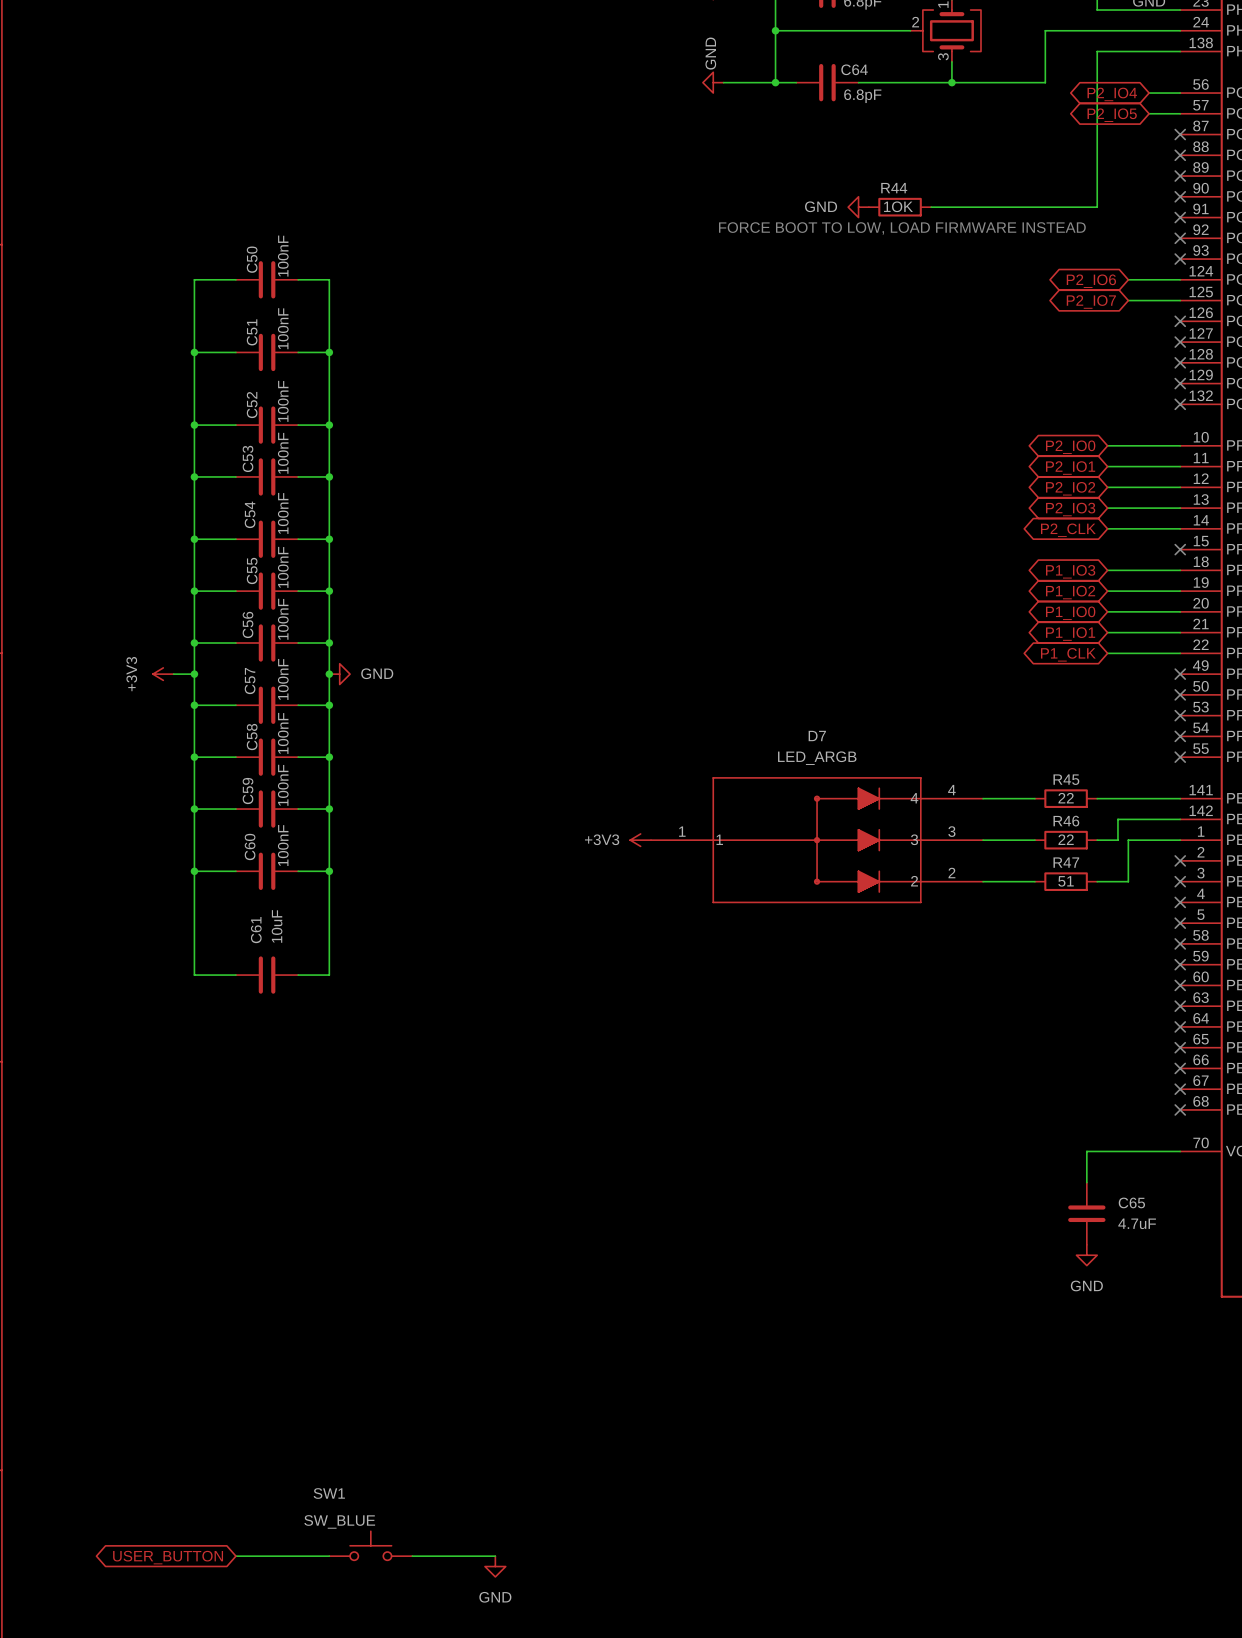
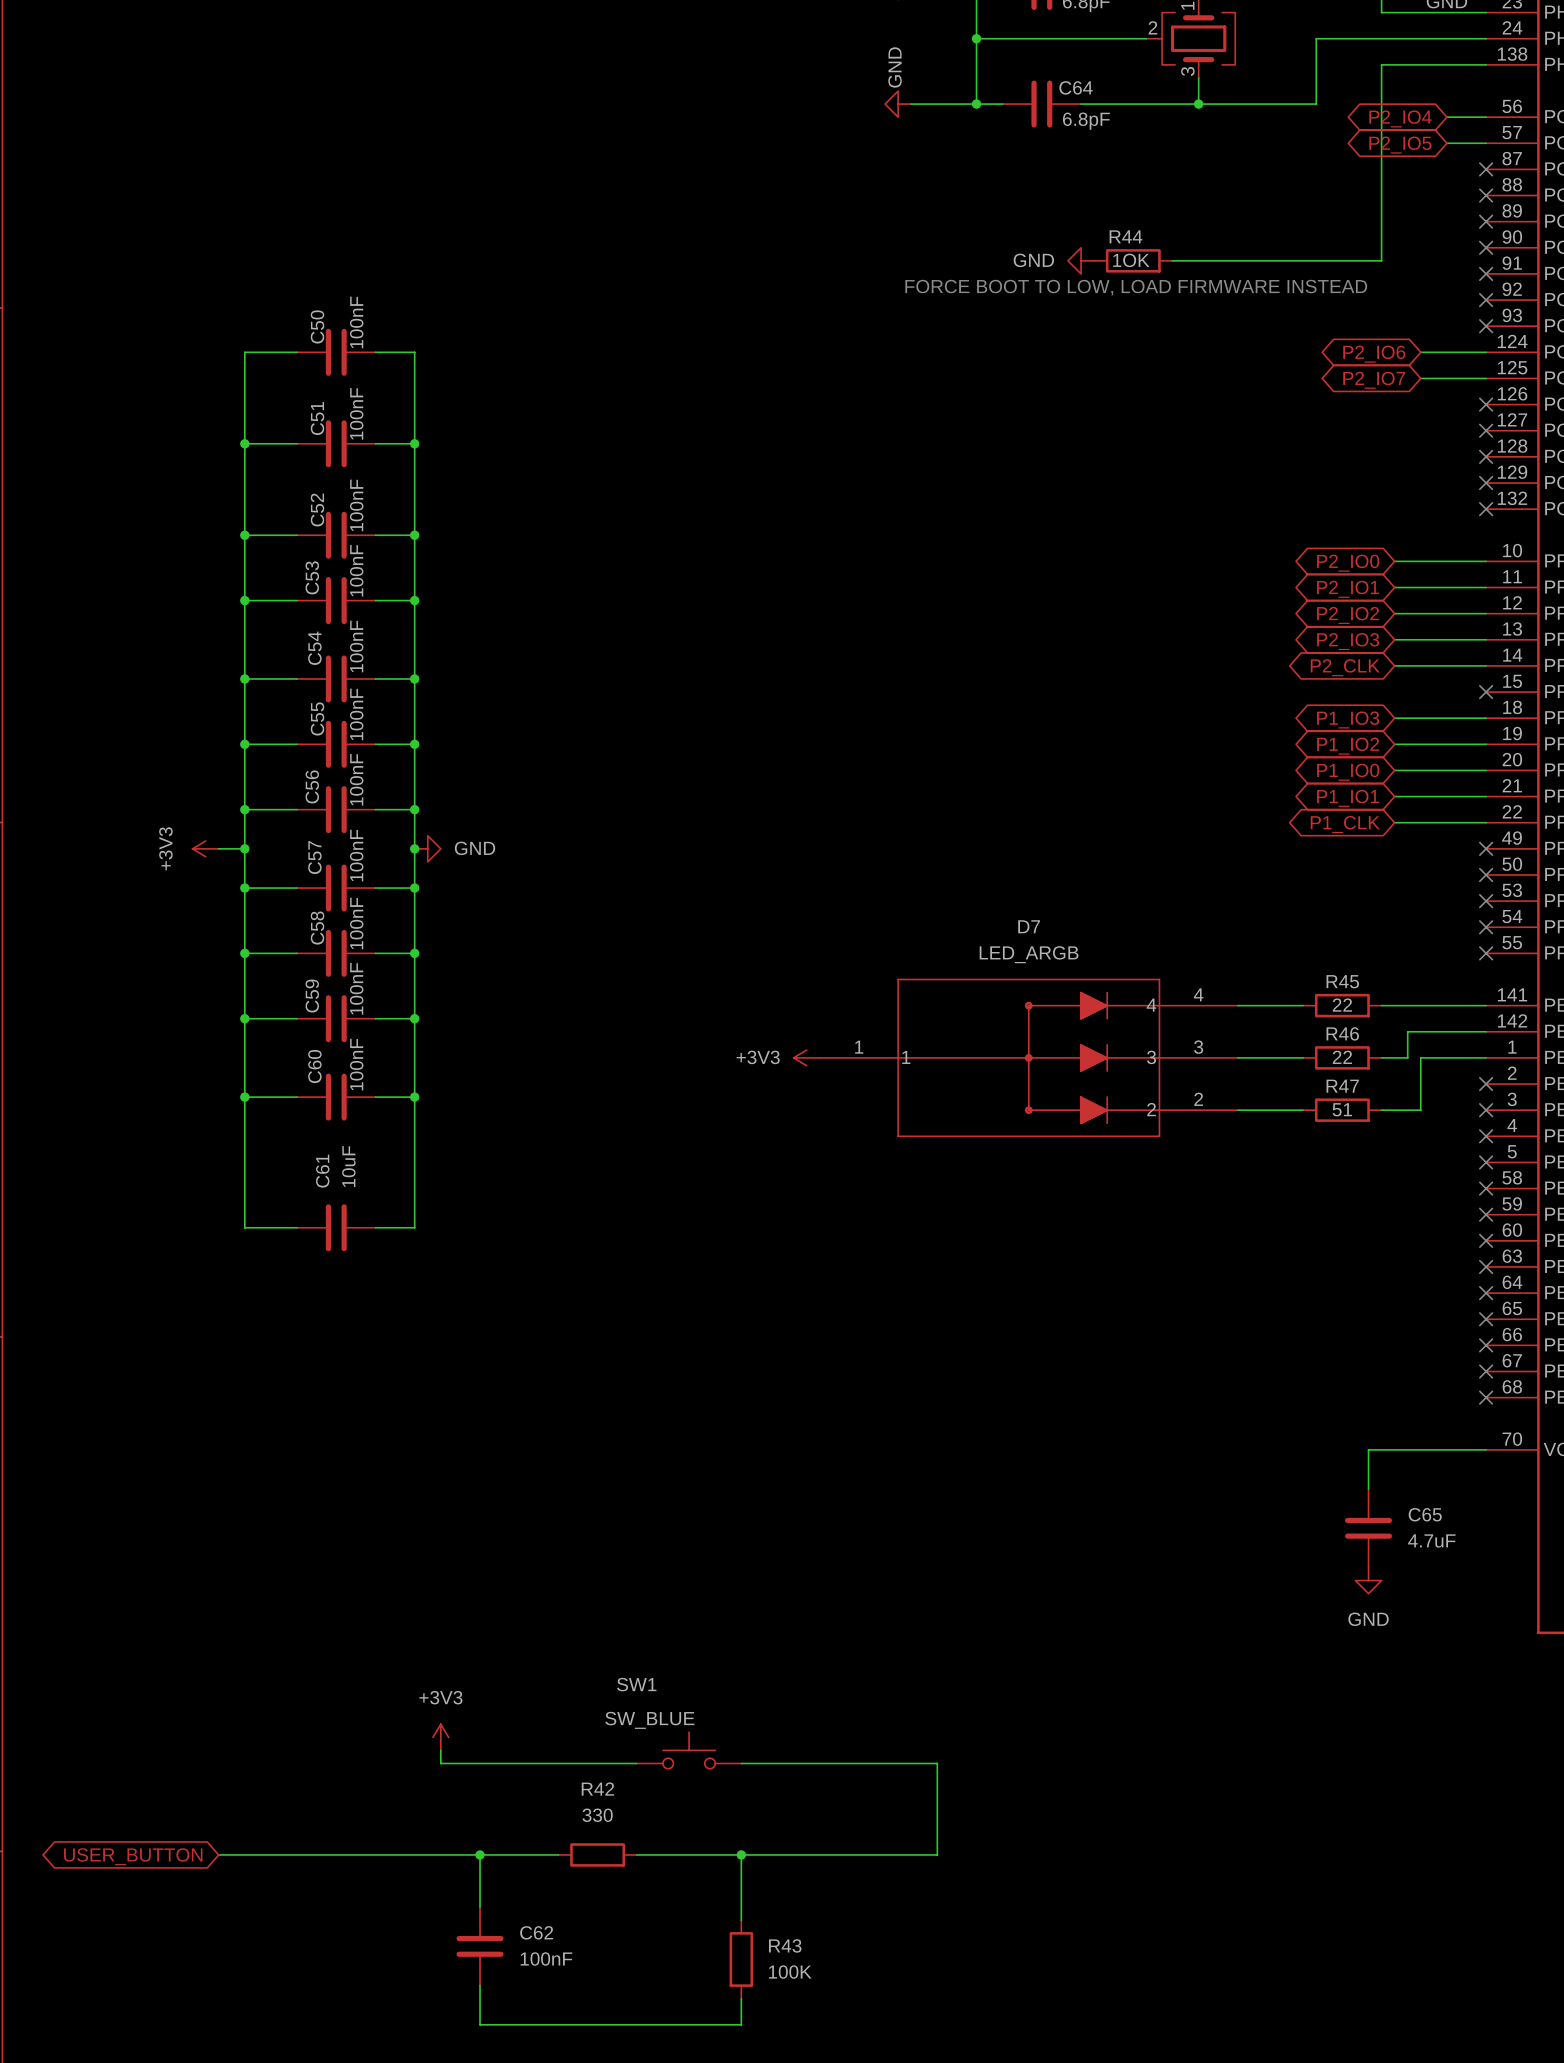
power symbol: none -> +3V3 (440, 1737)
wire: none -> (440, 1750) (440, 1763) (636, 1763)
wire: none -> (741, 1763) (937, 1763) (937, 1854) (636, 1854)
wire: none -> (218, 1854) (558, 1854)
wire: none -> (480, 1854) (480, 1907)
junction: none -> (480, 1854)
R42: none -> 330 (597, 1854)
wire: none -> (741, 1854) (741, 1920)
junction: none -> (741, 1854)
SW1 position: (370, 1545) -> (689, 1750)
C62: none -> 100nF (480, 1946)
wire: (235, 1556) (329, 1556) -> none
wire: (412, 1556) (495, 1556) -> none
R43: none -> 100K (741, 1959)
global label position: USER_BUTTON (168, 1557) -> USER_BUTTON (133, 1856)
power symbol: GND (495, 1566) -> none
wire: none -> (480, 1985) (480, 2024) (741, 2024) (741, 1998)

